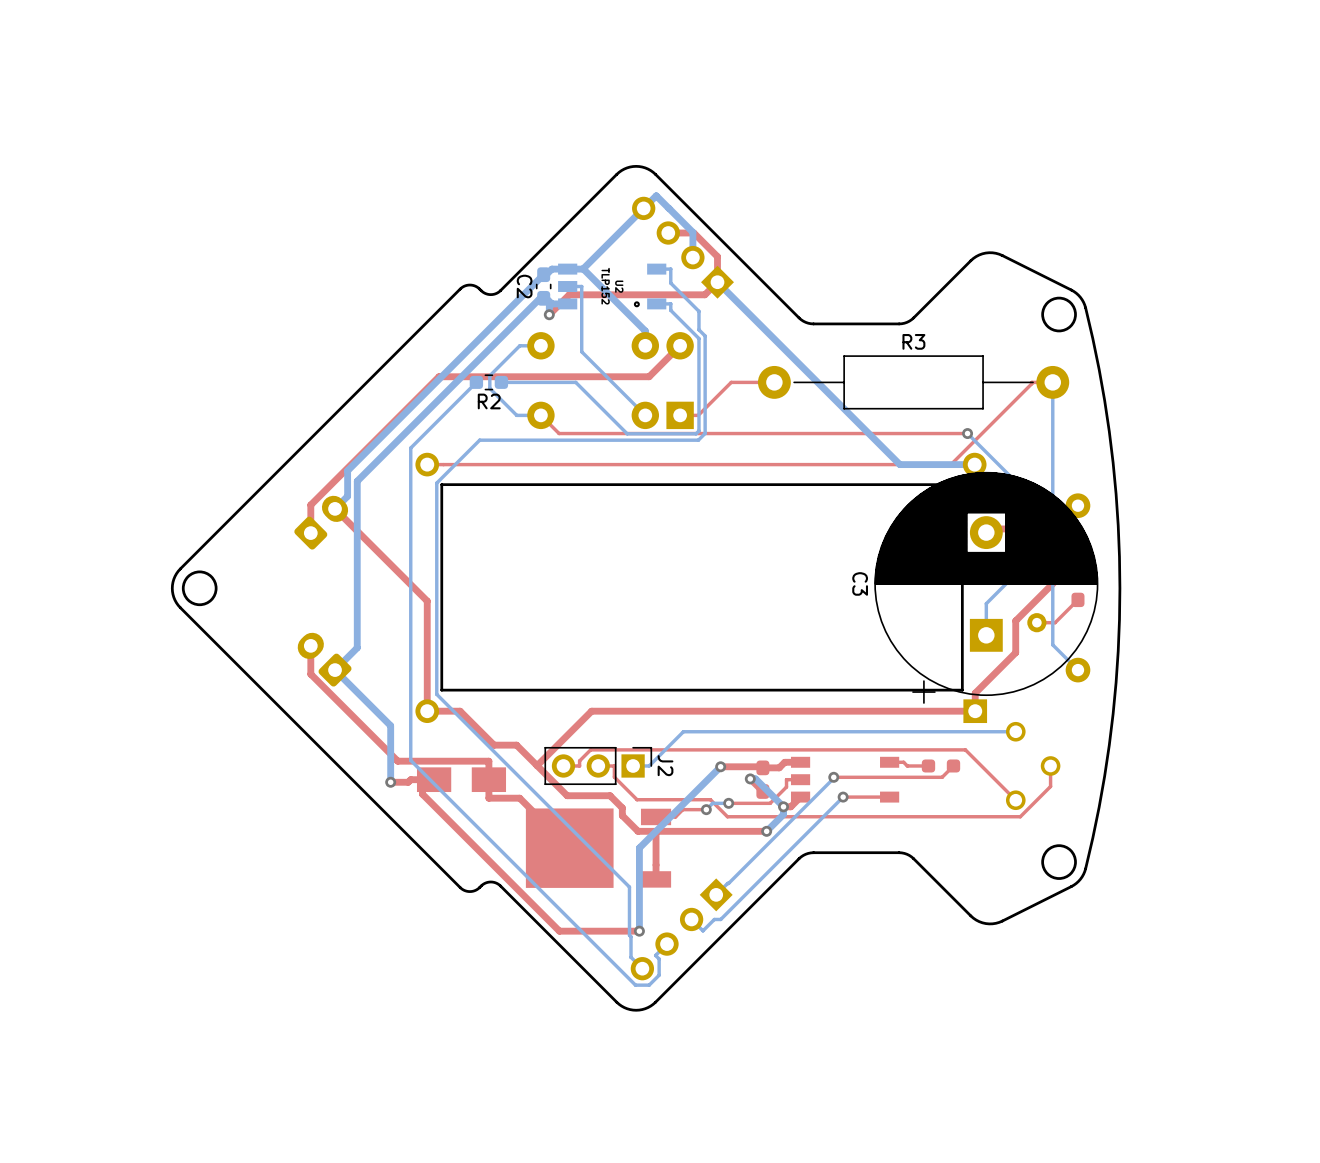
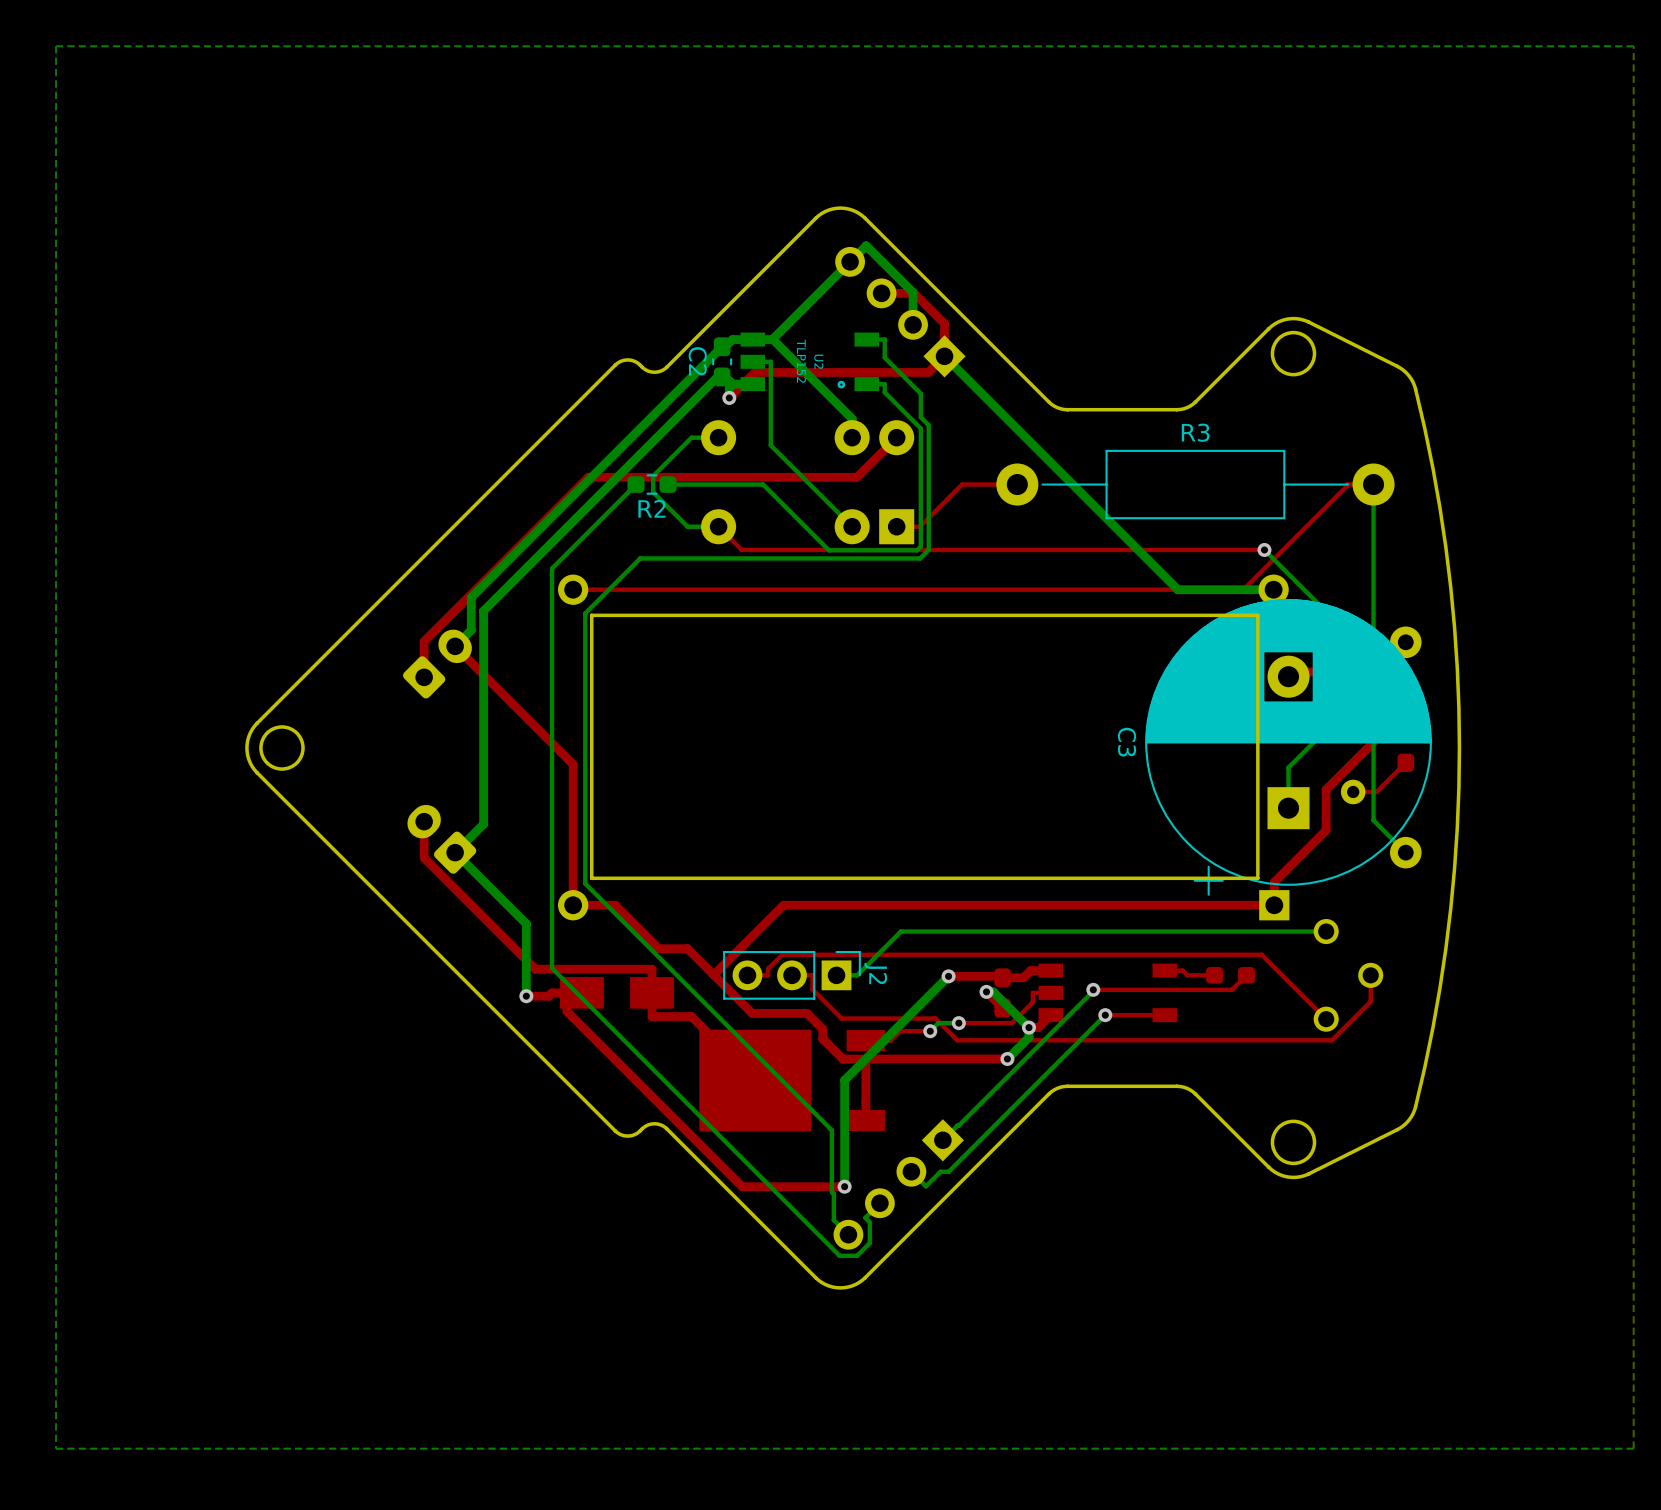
bottom zone outline: none -> (1633, 46) (1633, 1448) (56, 1448) (56, 46) (1633, 46)
round board edge position: (1059, 314) -> (1293, 353)
round board edge position: (1059, 862) -> (1293, 1142)

